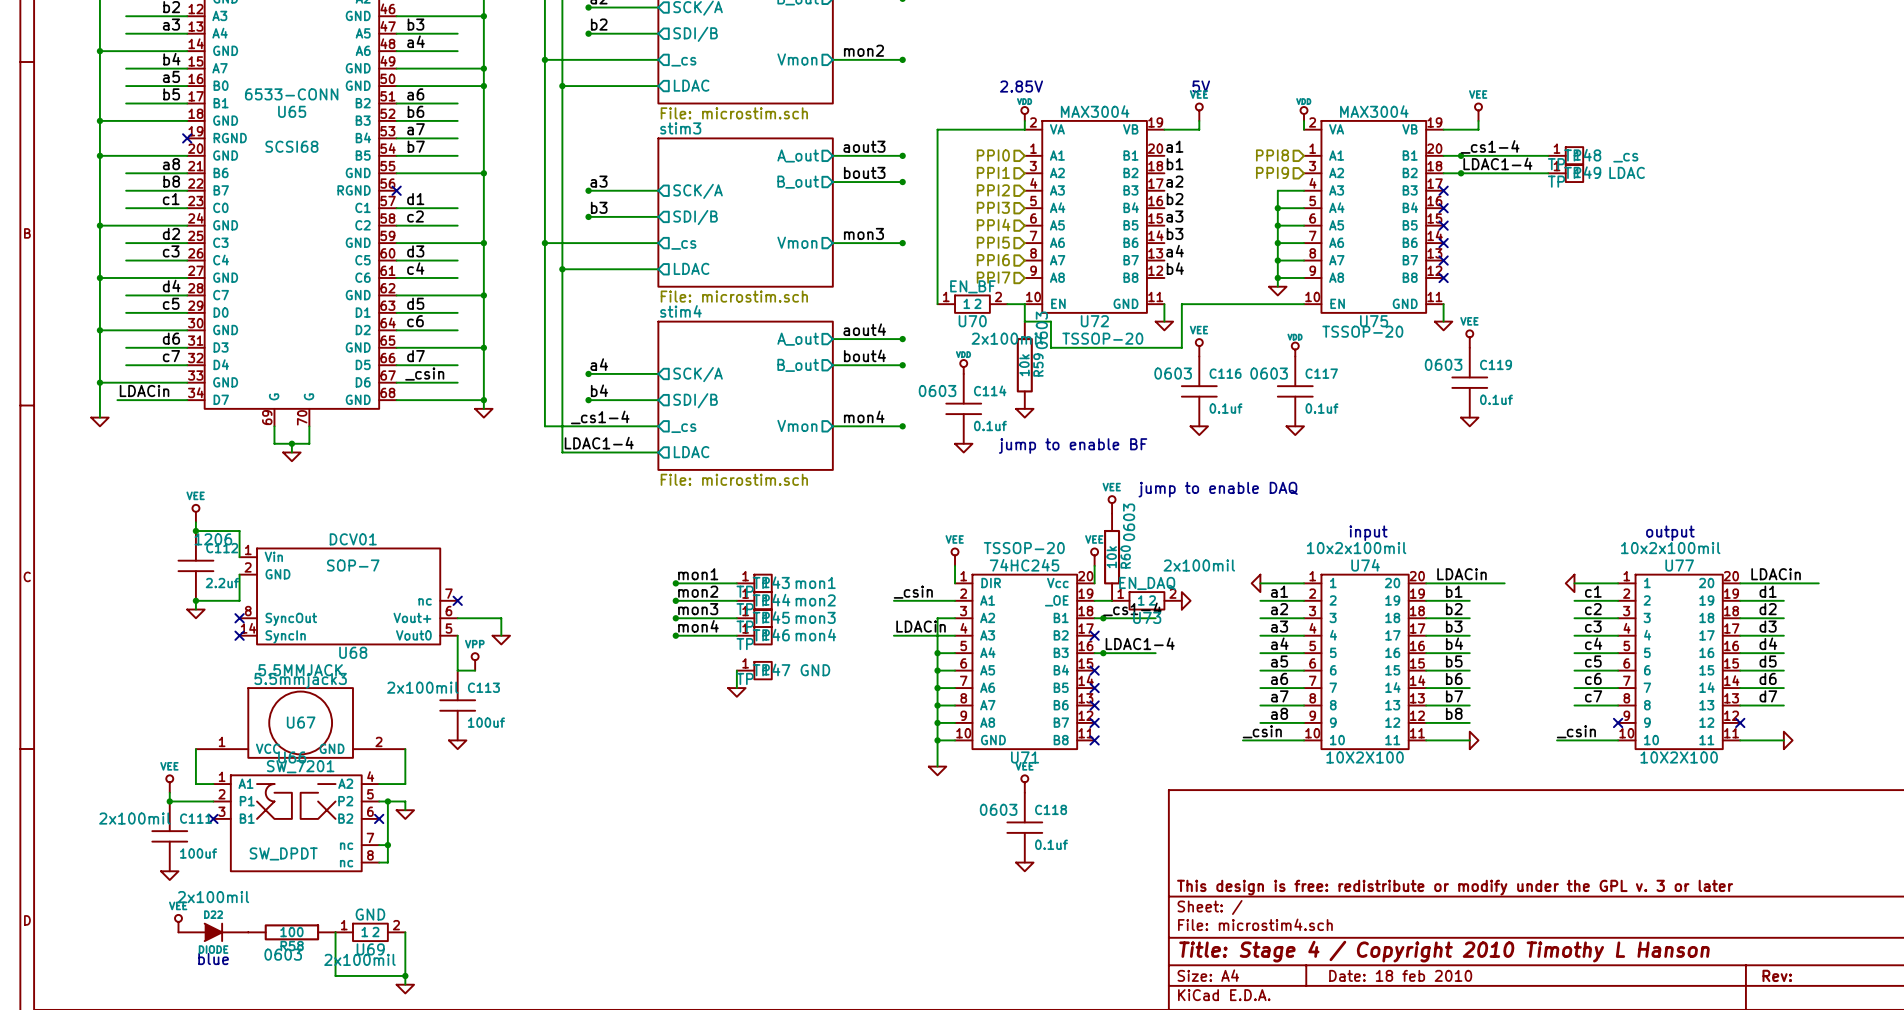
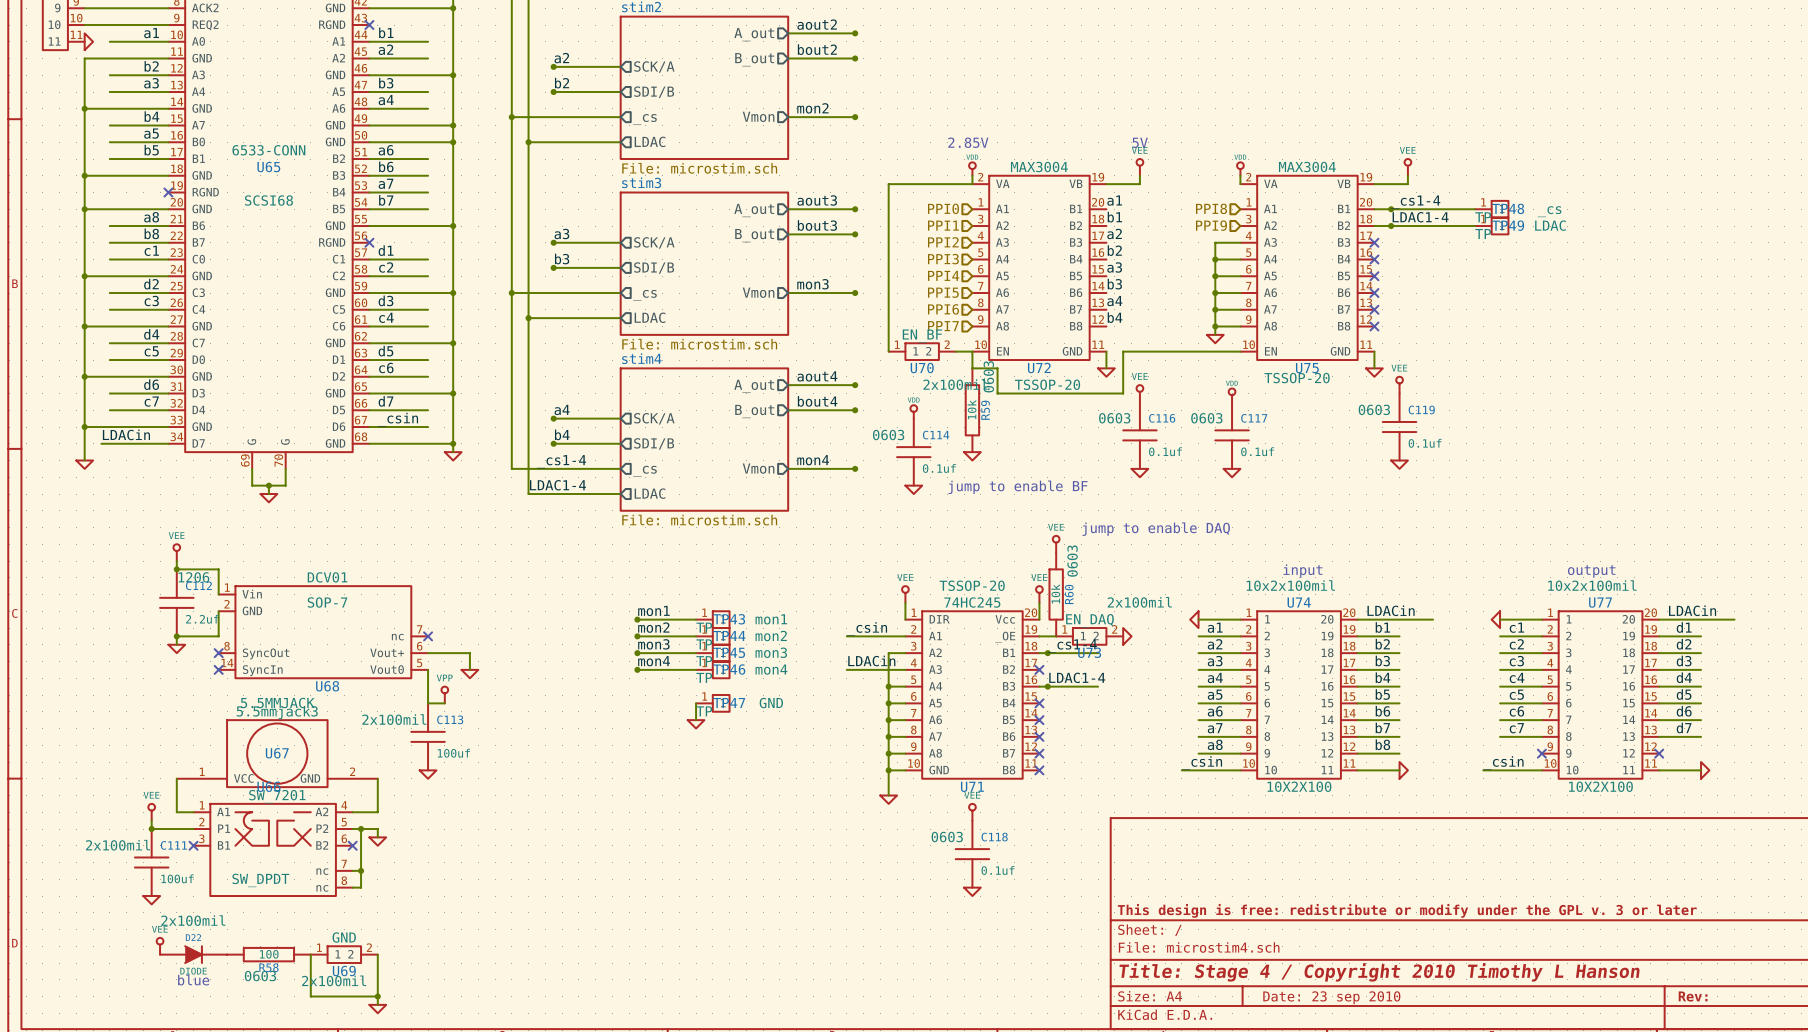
title block: Date: 18 feb 2010 (1400, 975) -> Date: 23 sep 2010 (1331, 997)

